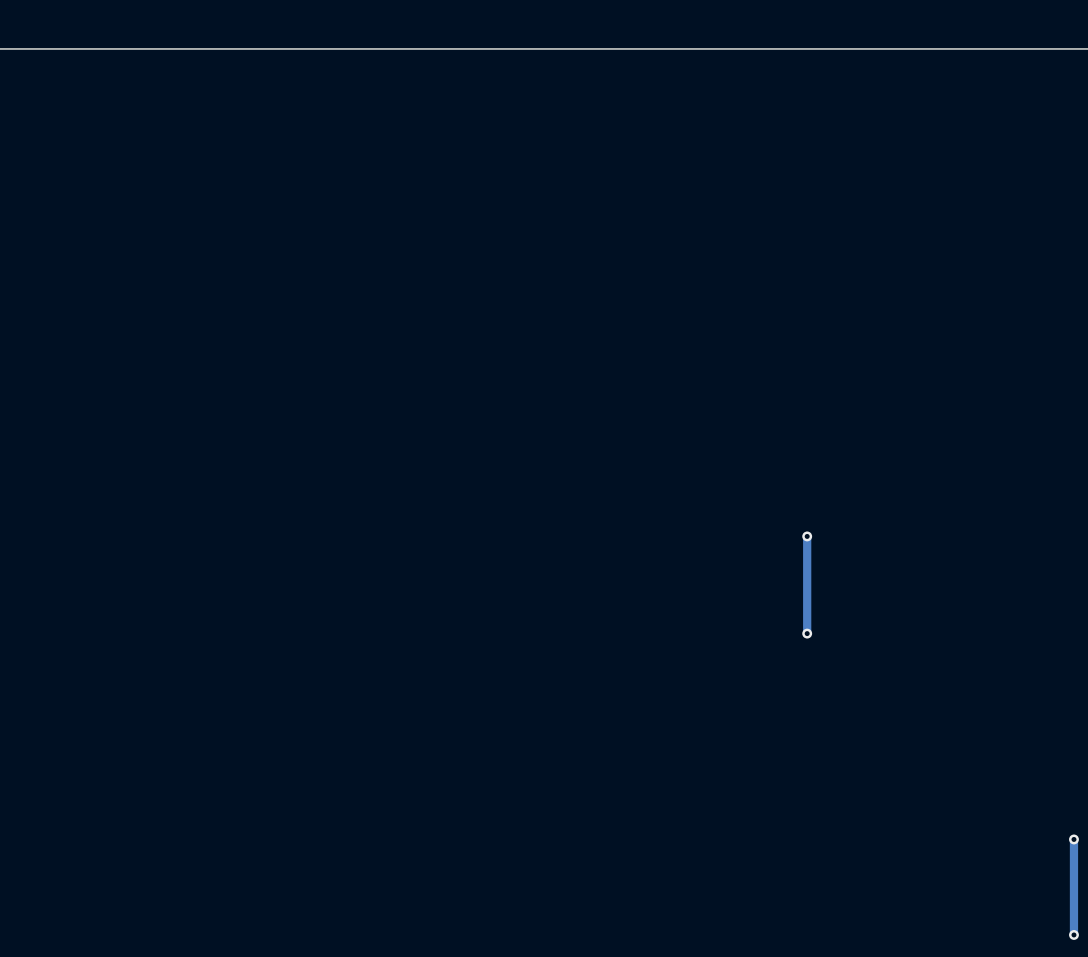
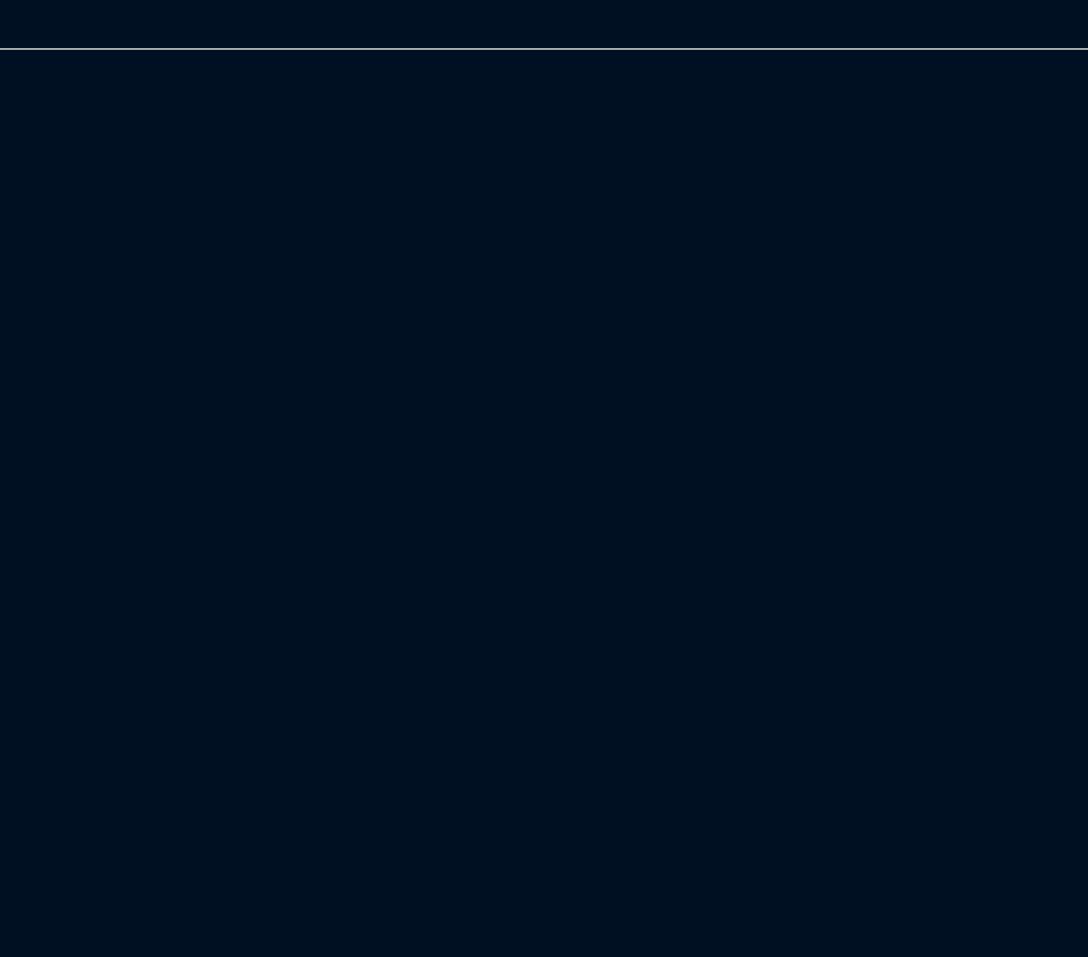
track: (807, 536) (807, 633) -> none
via: (807, 536) -> none
via: (807, 633) -> none
track: (1073, 839) (1073, 934) -> none
via: (1073, 839) -> none
via: (1073, 934) -> none

